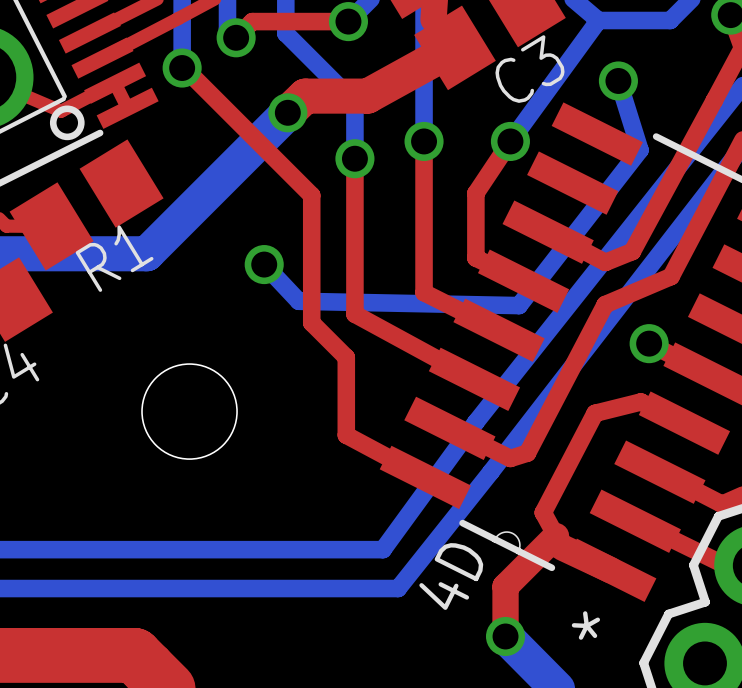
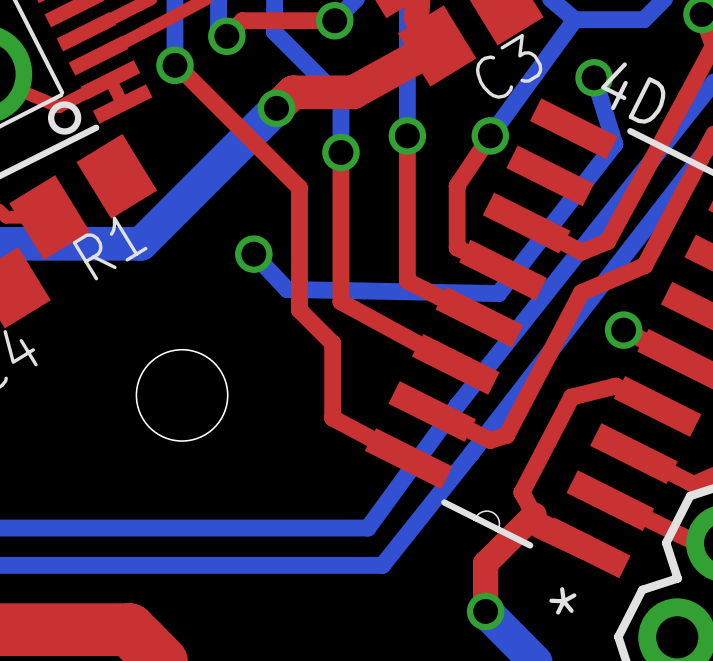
4D name rotation: 0° (451, 576) -> 90° clockwise (633, 93)
4D name position: 4D (451, 576) -> 4D (633, 93)

